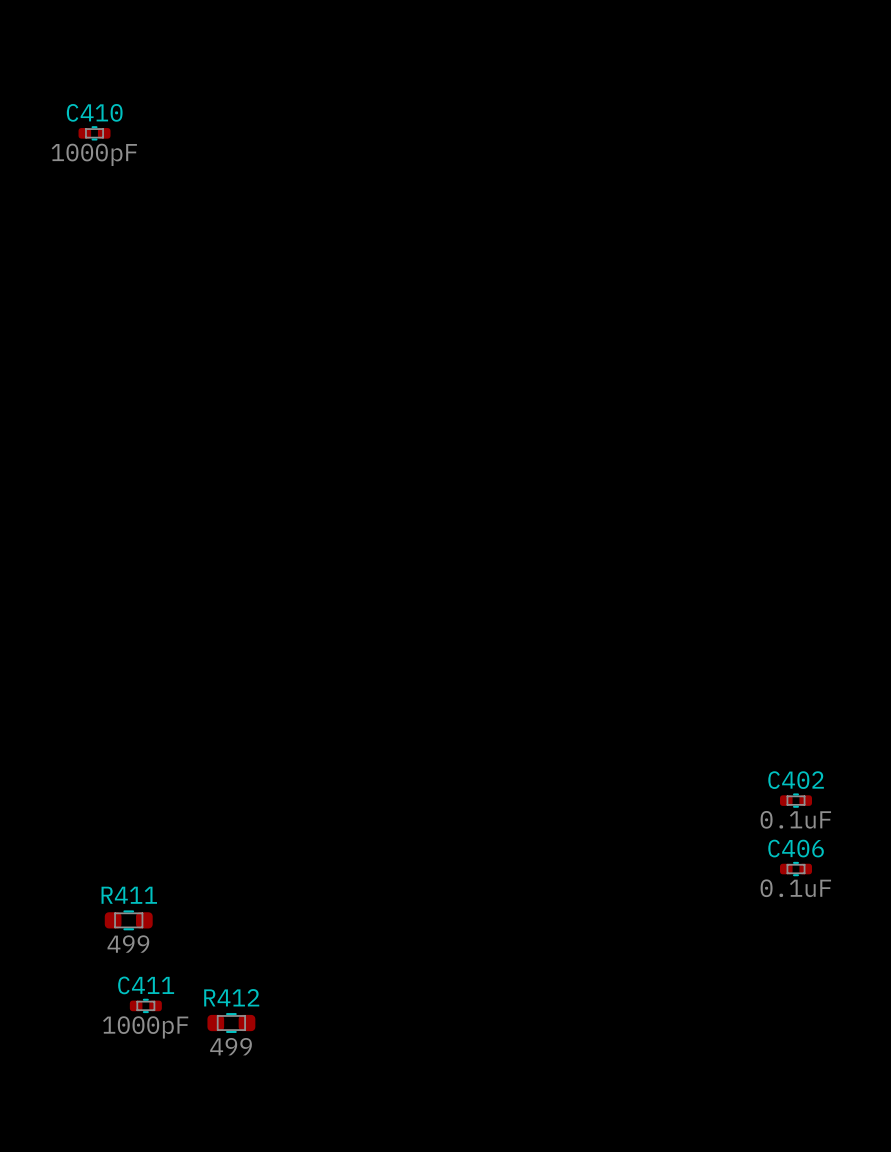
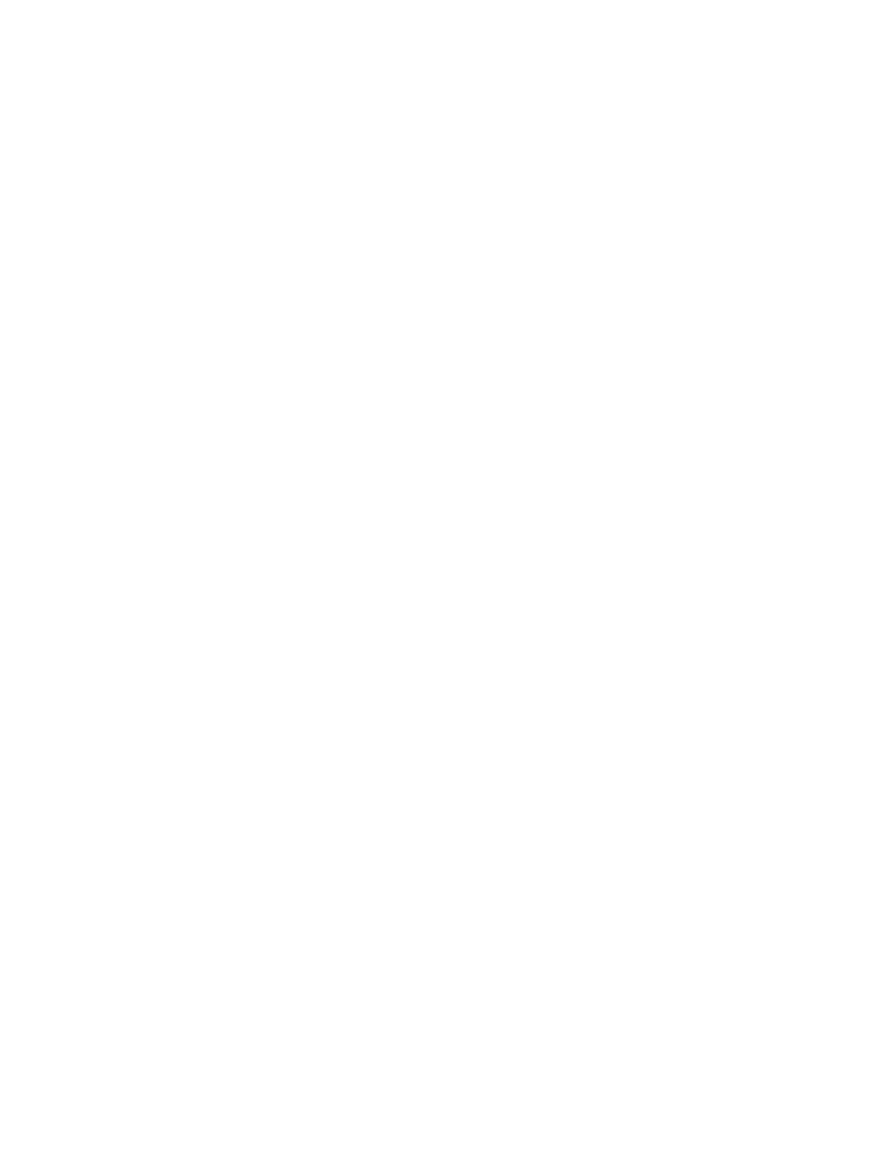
C410: 1000pF (94, 133) -> none
C402: 0.1uF (795, 800) -> none
C406: 0.1uF (795, 869) -> none
R411: 499 (128, 920) -> none
C411: 1000pF (145, 1005) -> none
R412: 499 (231, 1023) -> none

